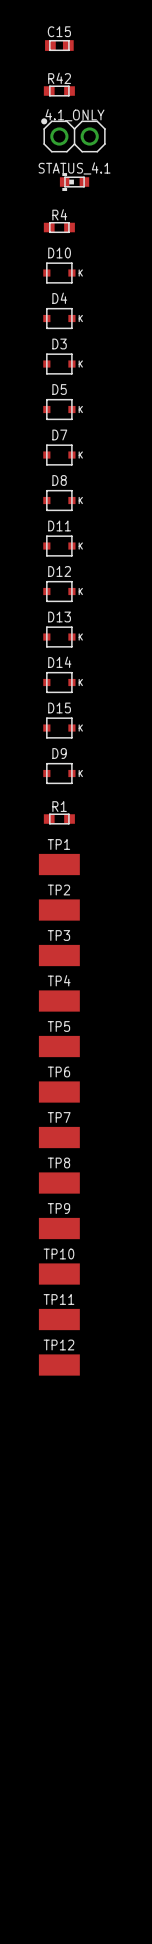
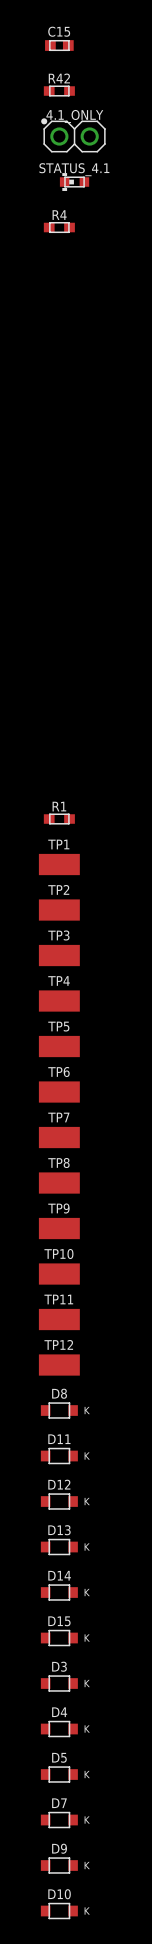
D10 footprint: [43, 262, 76, 284] -> [40, 1902, 78, 1920]
D4 footprint: [43, 307, 76, 330] -> [40, 1720, 78, 1738]
D3 footprint: [43, 353, 76, 375] -> [40, 1675, 78, 1692]
D5 footprint: [43, 398, 76, 421] -> [40, 1766, 78, 1783]
D7 footprint: [43, 444, 76, 466] -> [40, 1811, 78, 1829]
D8 footprint: [43, 489, 76, 512] -> [40, 1402, 78, 1419]
D11 footprint: [43, 535, 76, 557] -> [40, 1447, 78, 1465]
D12 footprint: [43, 580, 76, 603] -> [40, 1493, 78, 1510]
D13 footprint: [43, 626, 76, 648] -> [40, 1538, 78, 1556]
D14 footprint: [43, 671, 76, 694] -> [40, 1584, 78, 1601]
D15 footprint: [43, 717, 76, 739] -> [40, 1629, 78, 1647]
D9 footprint: [43, 762, 76, 785] -> [40, 1857, 78, 1874]

